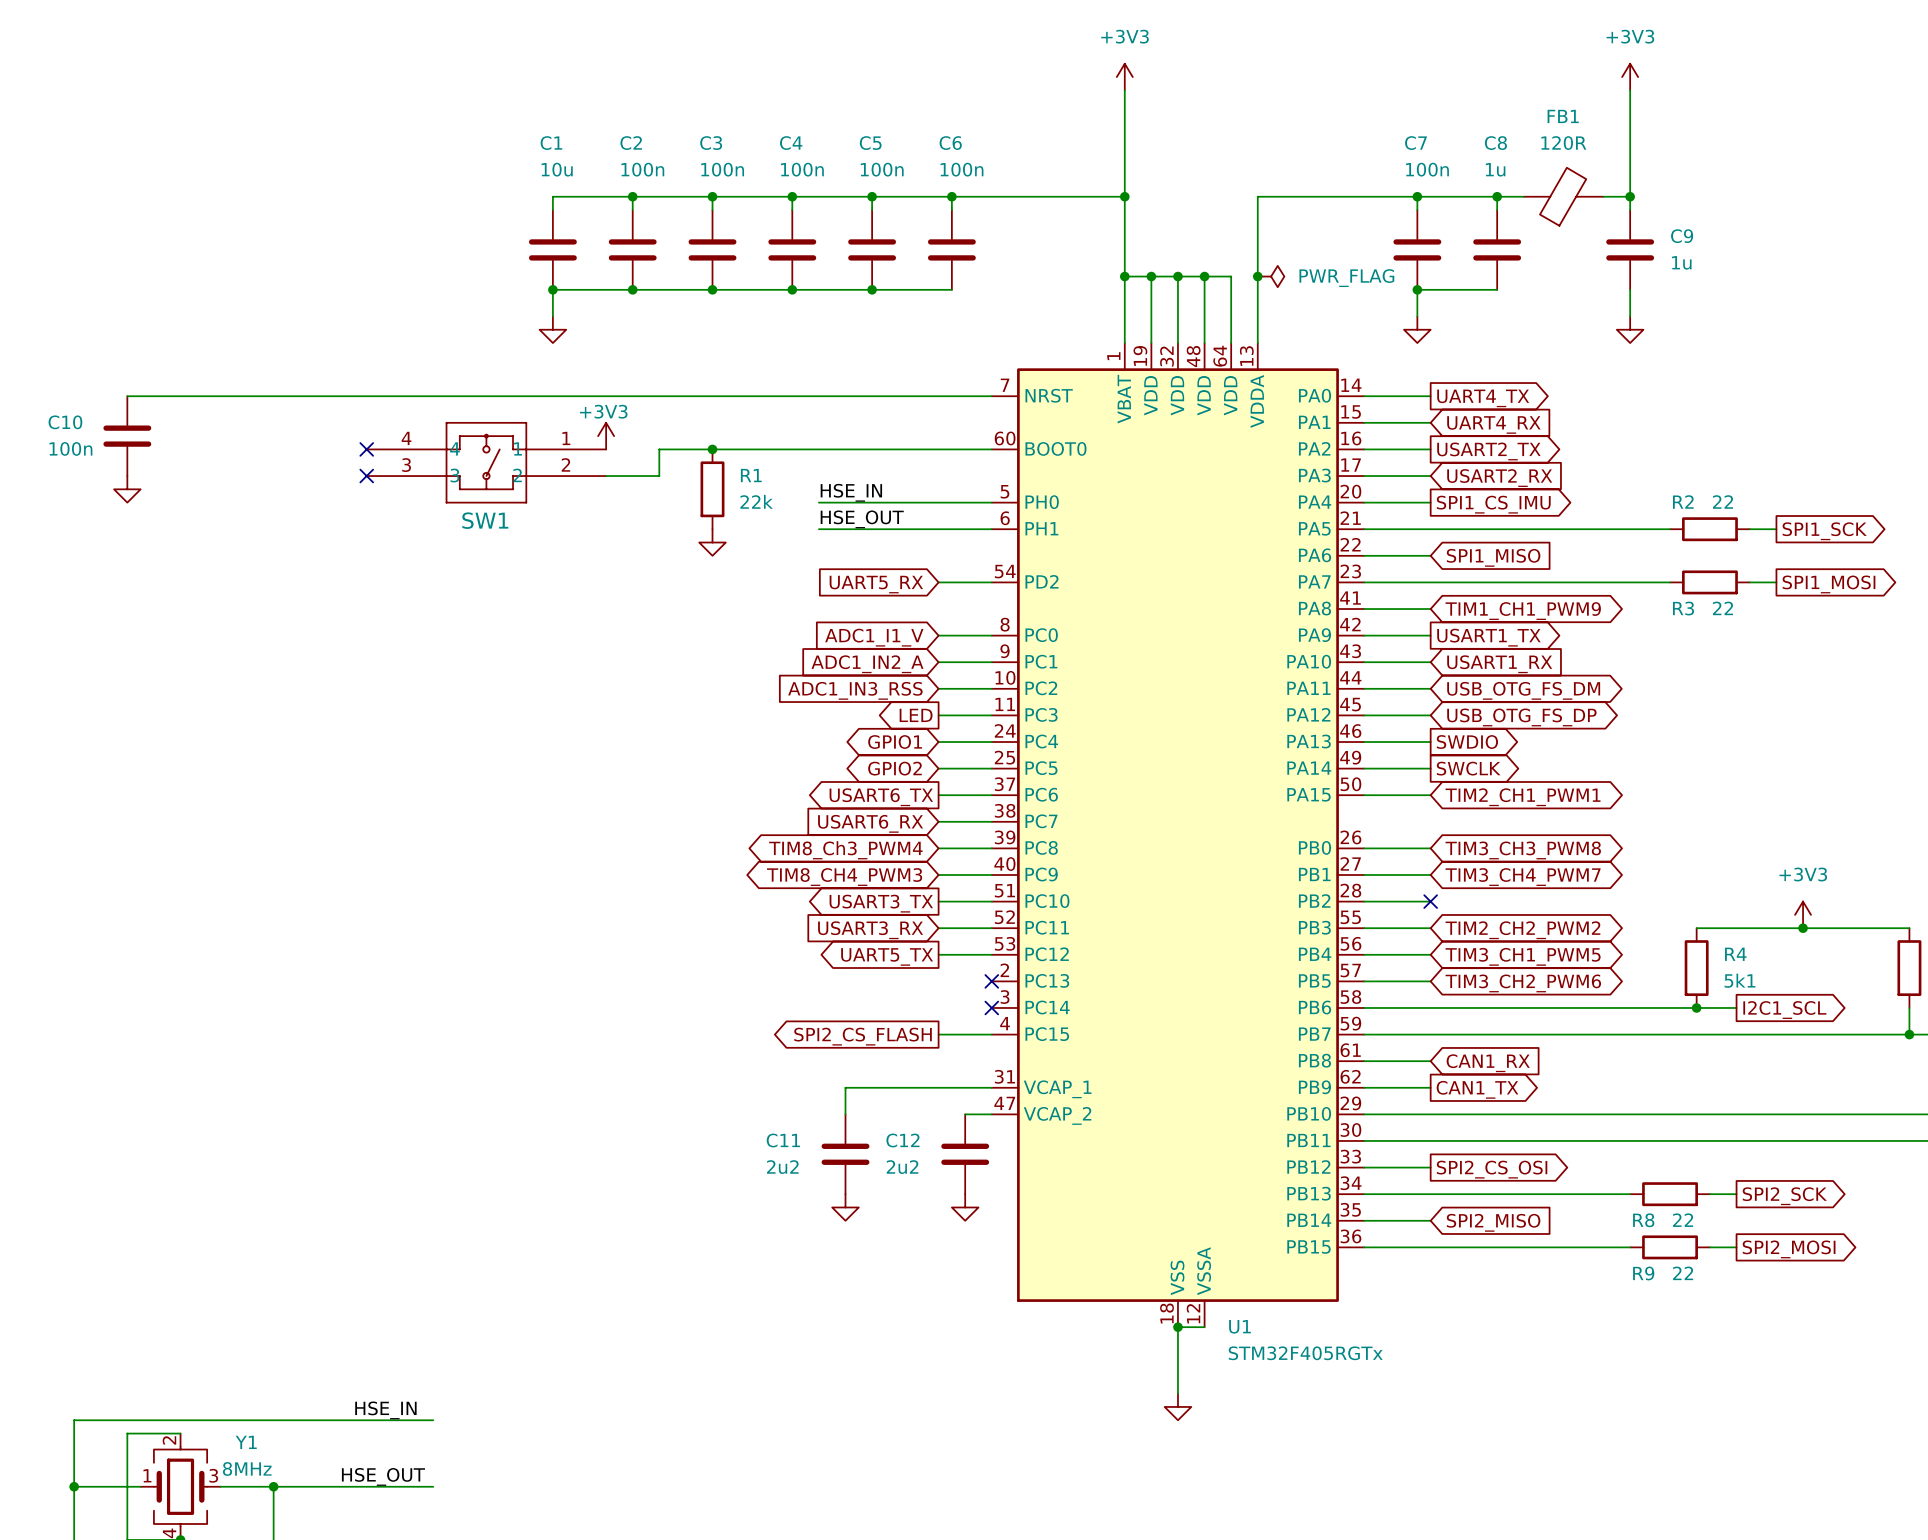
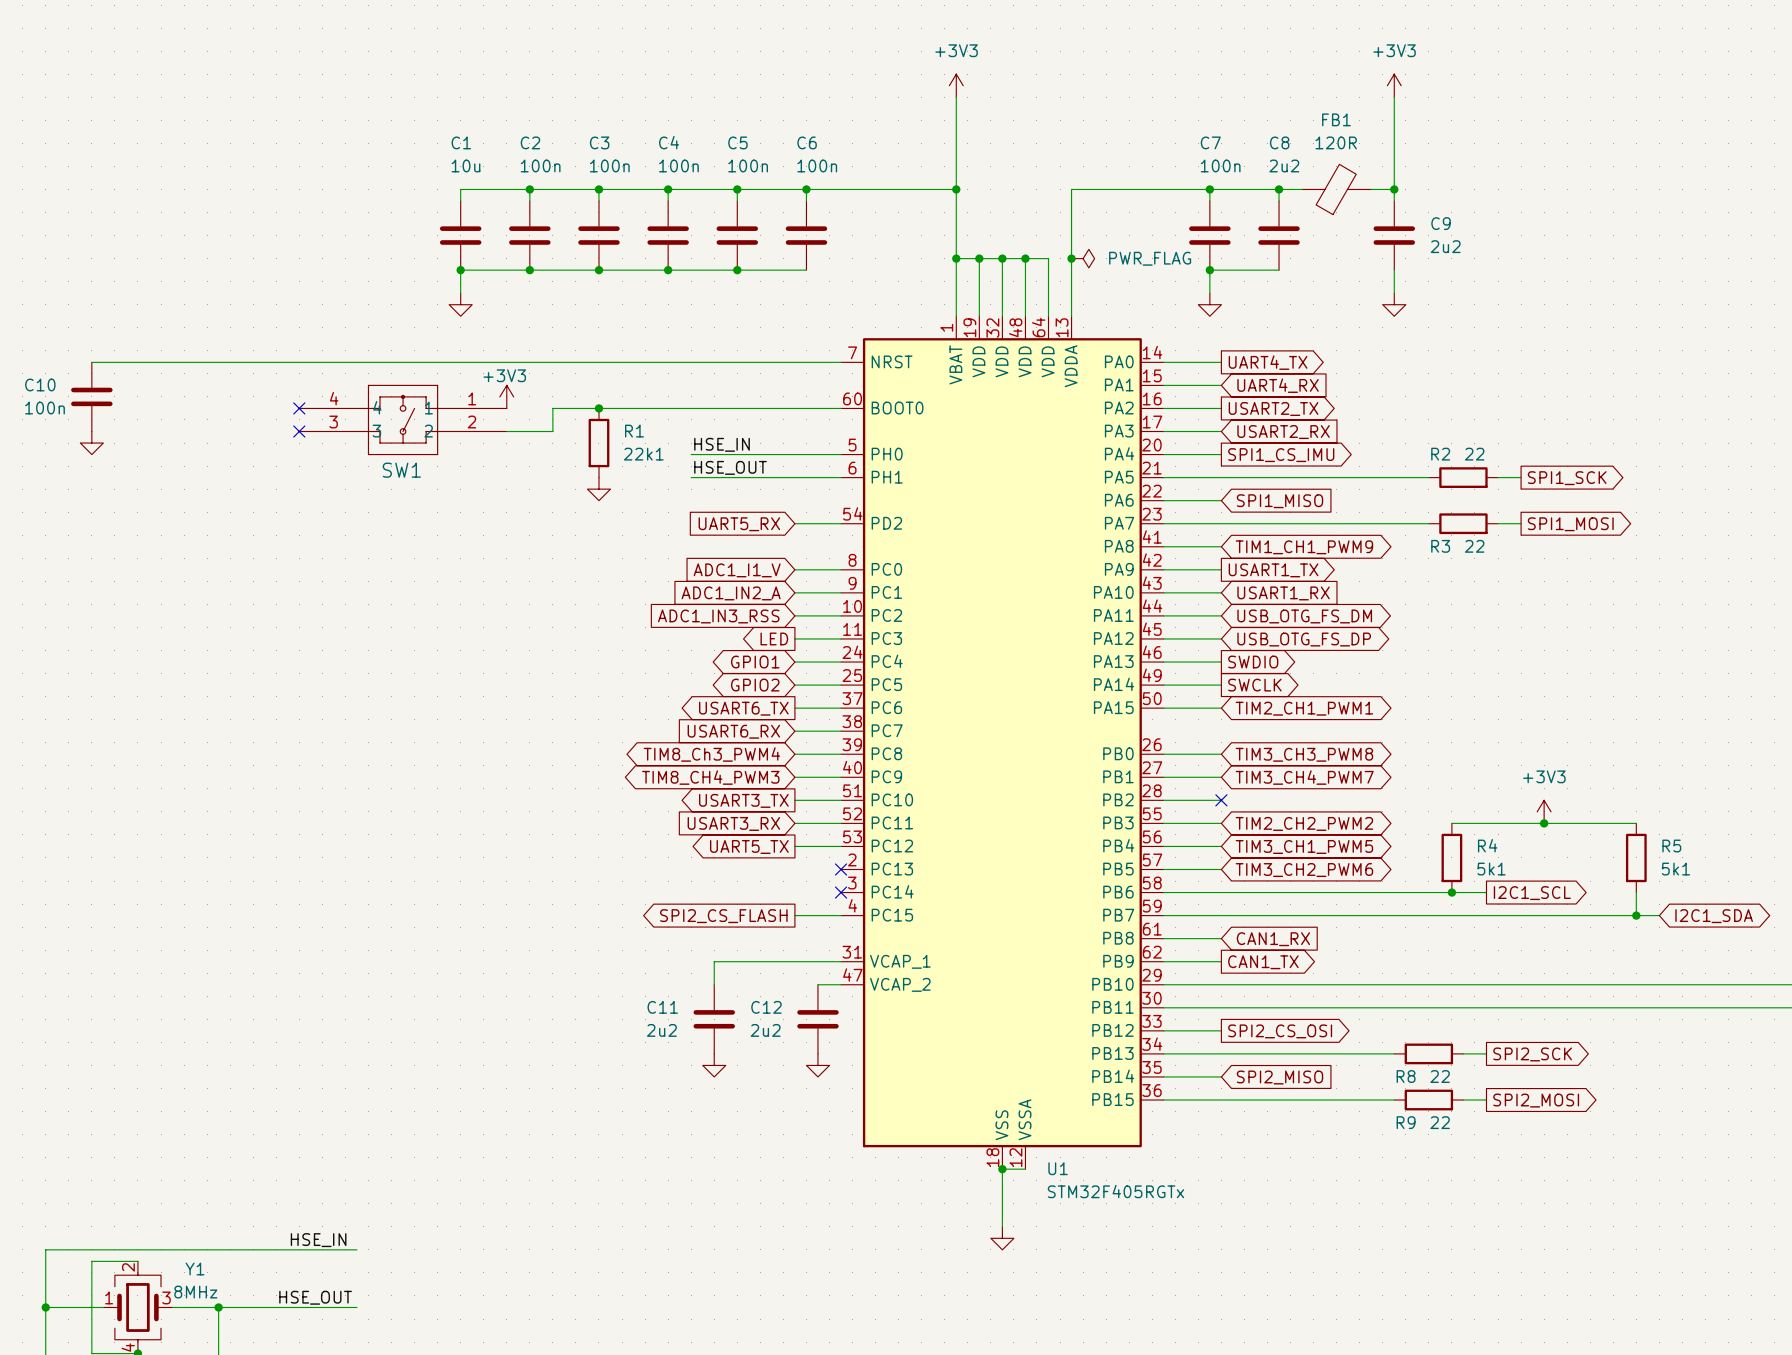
C8 value: 1u (1495, 169) -> 2u2 (1284, 165)
C9 value: 1u (1681, 262) -> 2u2 (1445, 246)
R1 value: 22k (756, 501) -> 22k1 (643, 454)

